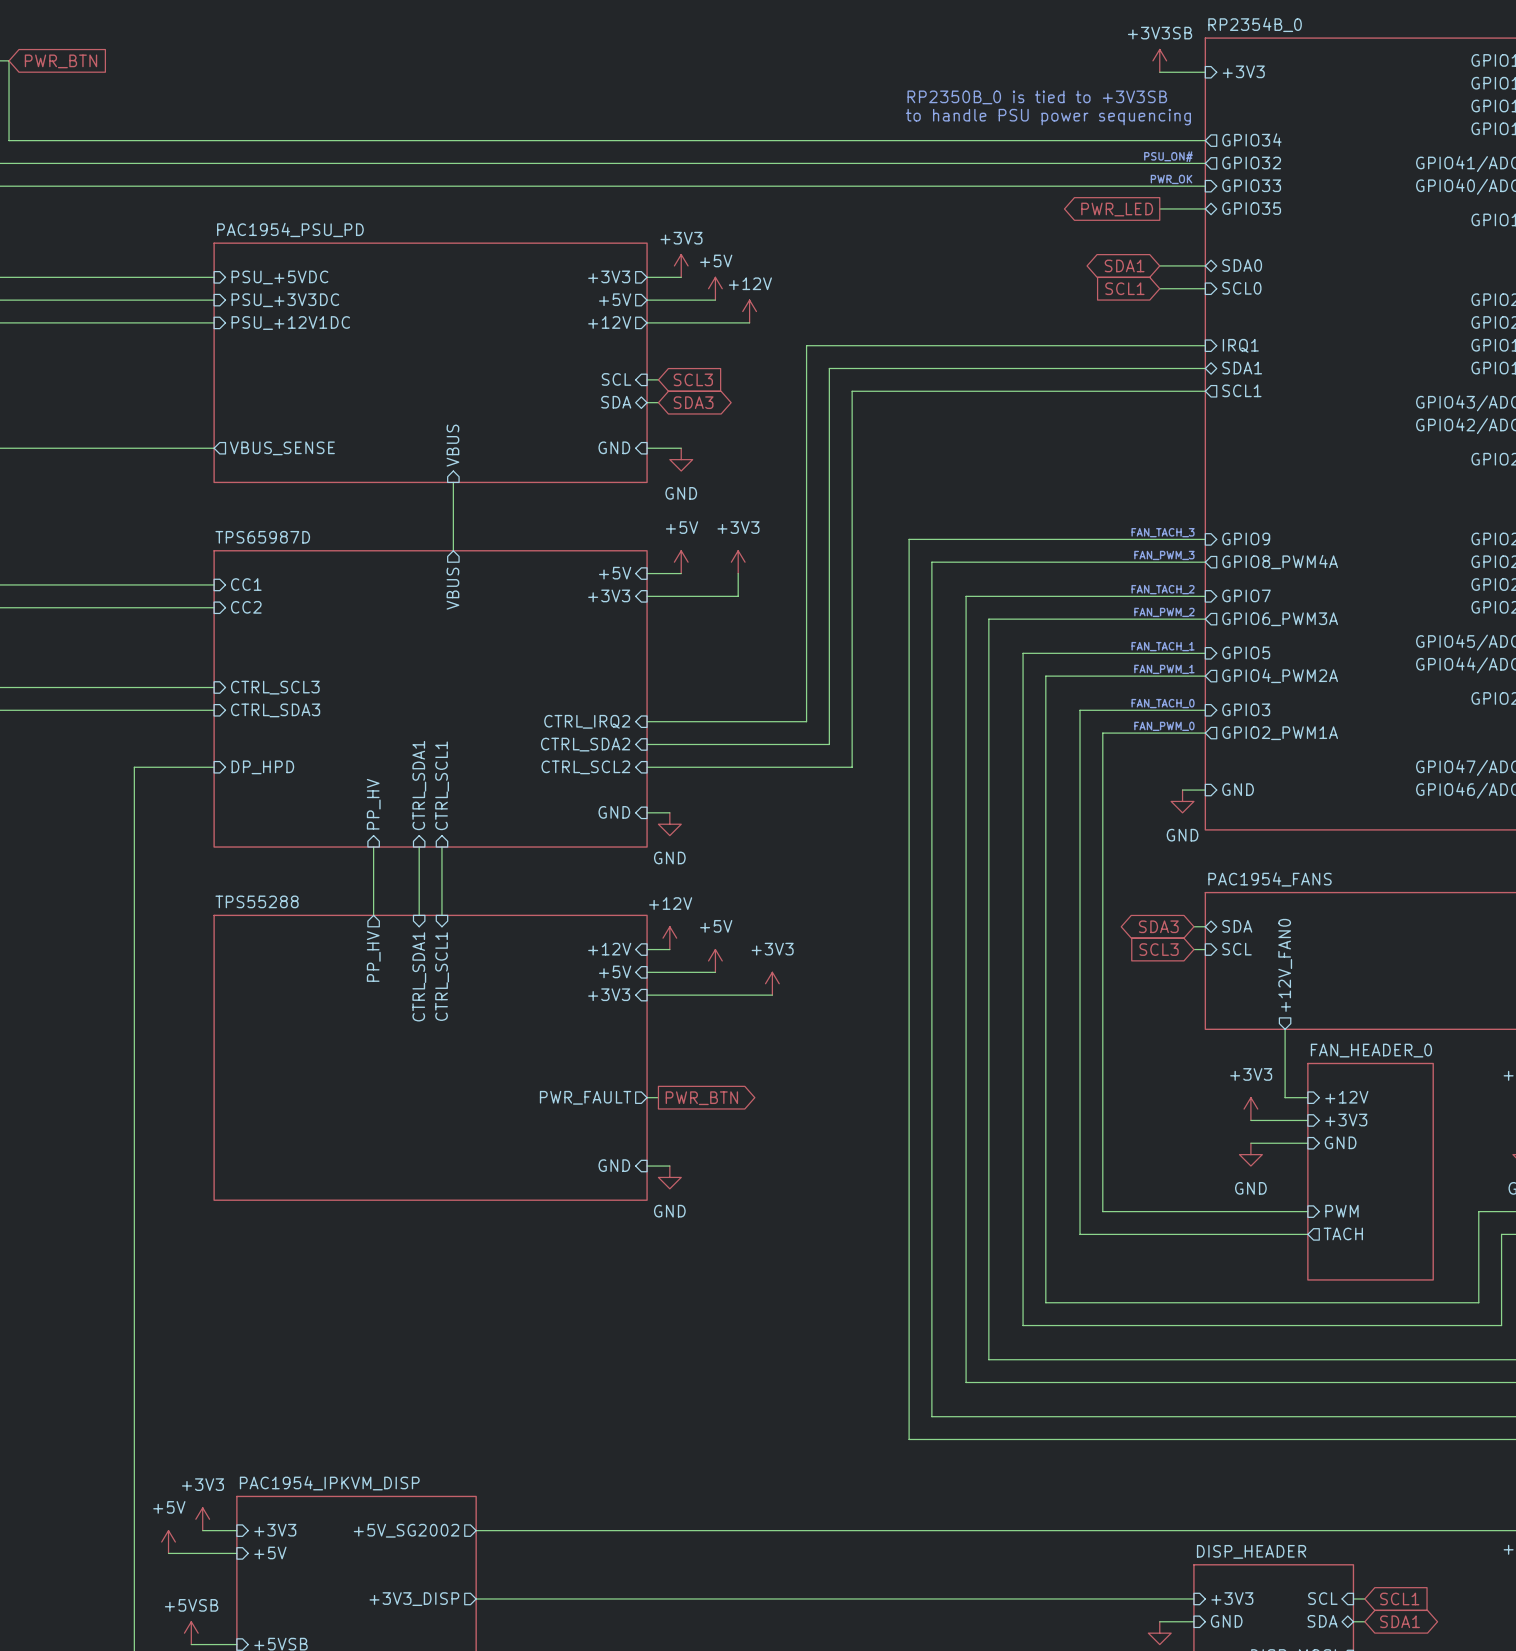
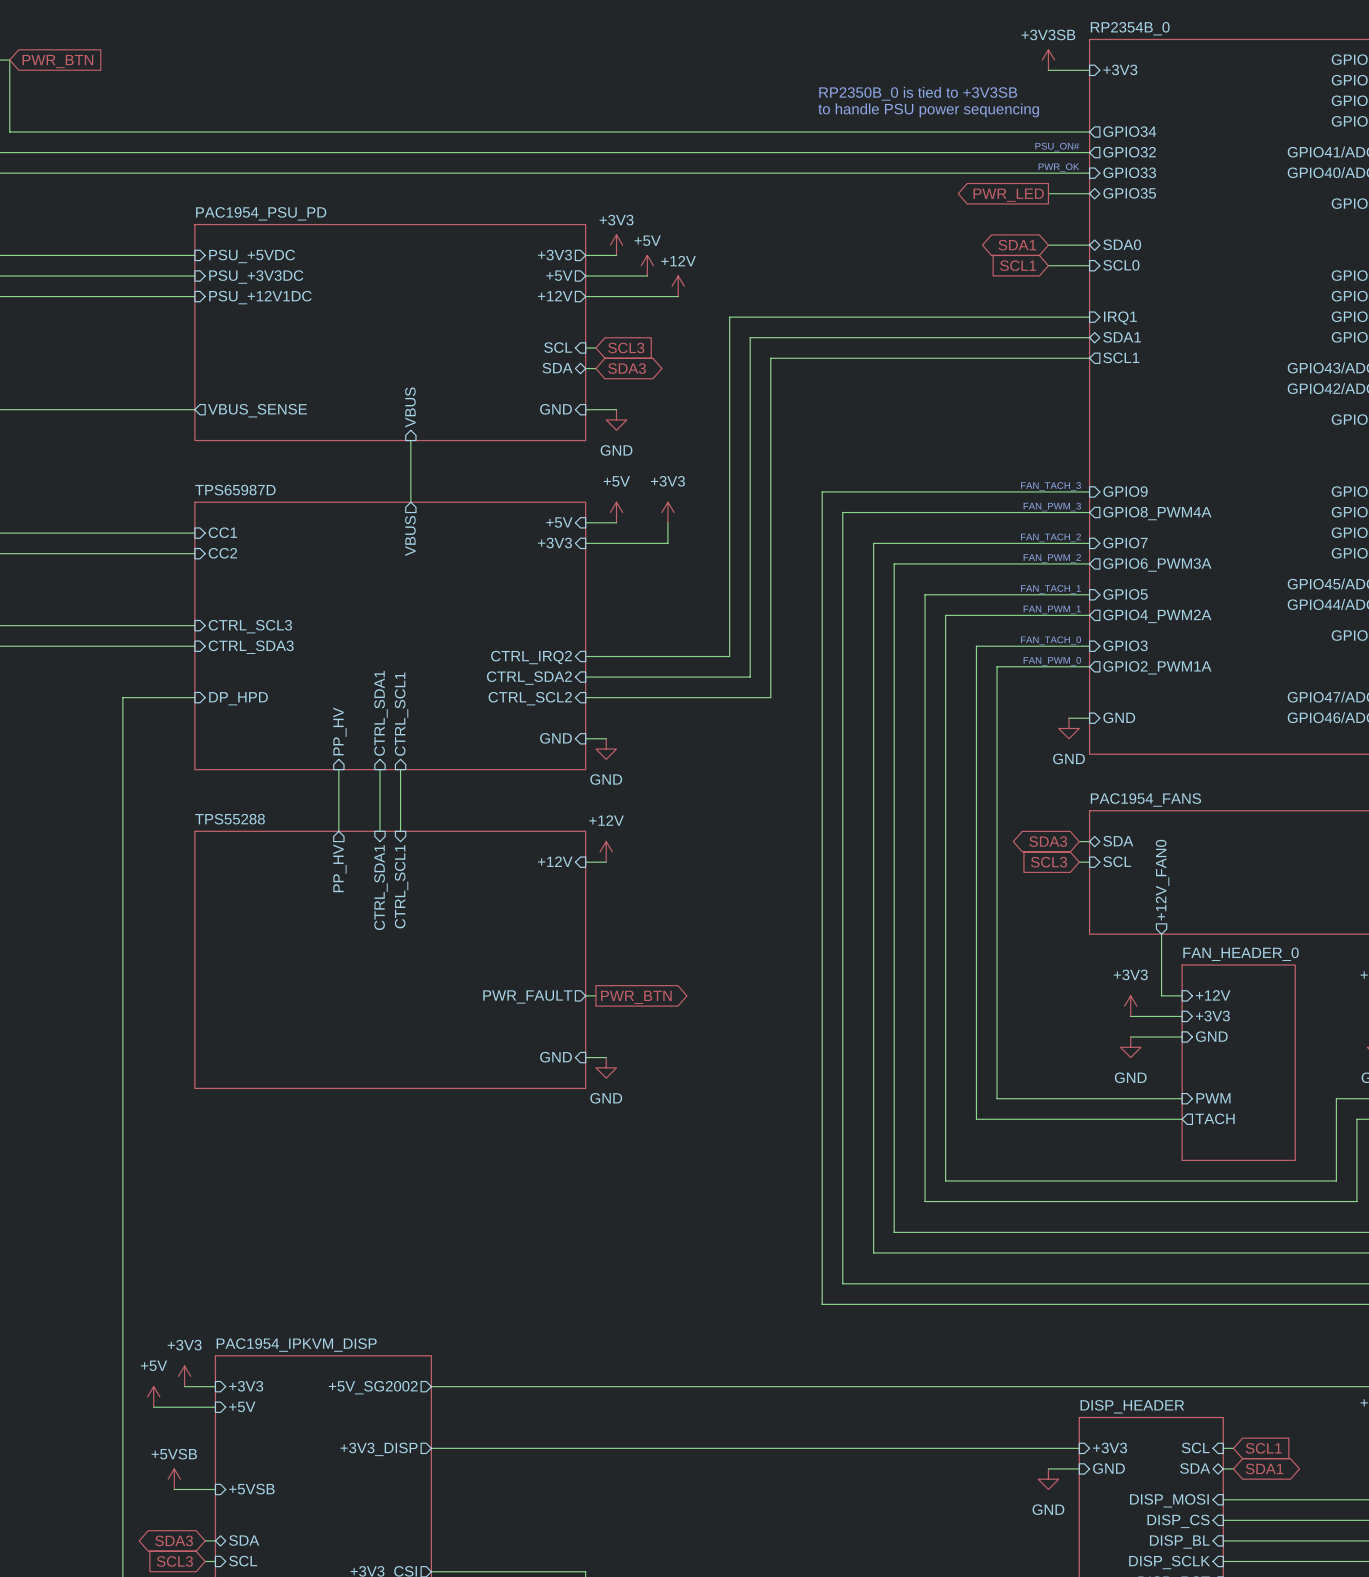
power symbol: +5V (715, 960) -> none
sheet pin: +5V (615, 971) -> none
wire: (647, 972) (715, 972) -> none
power symbol: +3V3 (772, 983) -> none
sheet pin: +3V3 (609, 994) -> none
wire: (647, 995) (772, 995) -> none

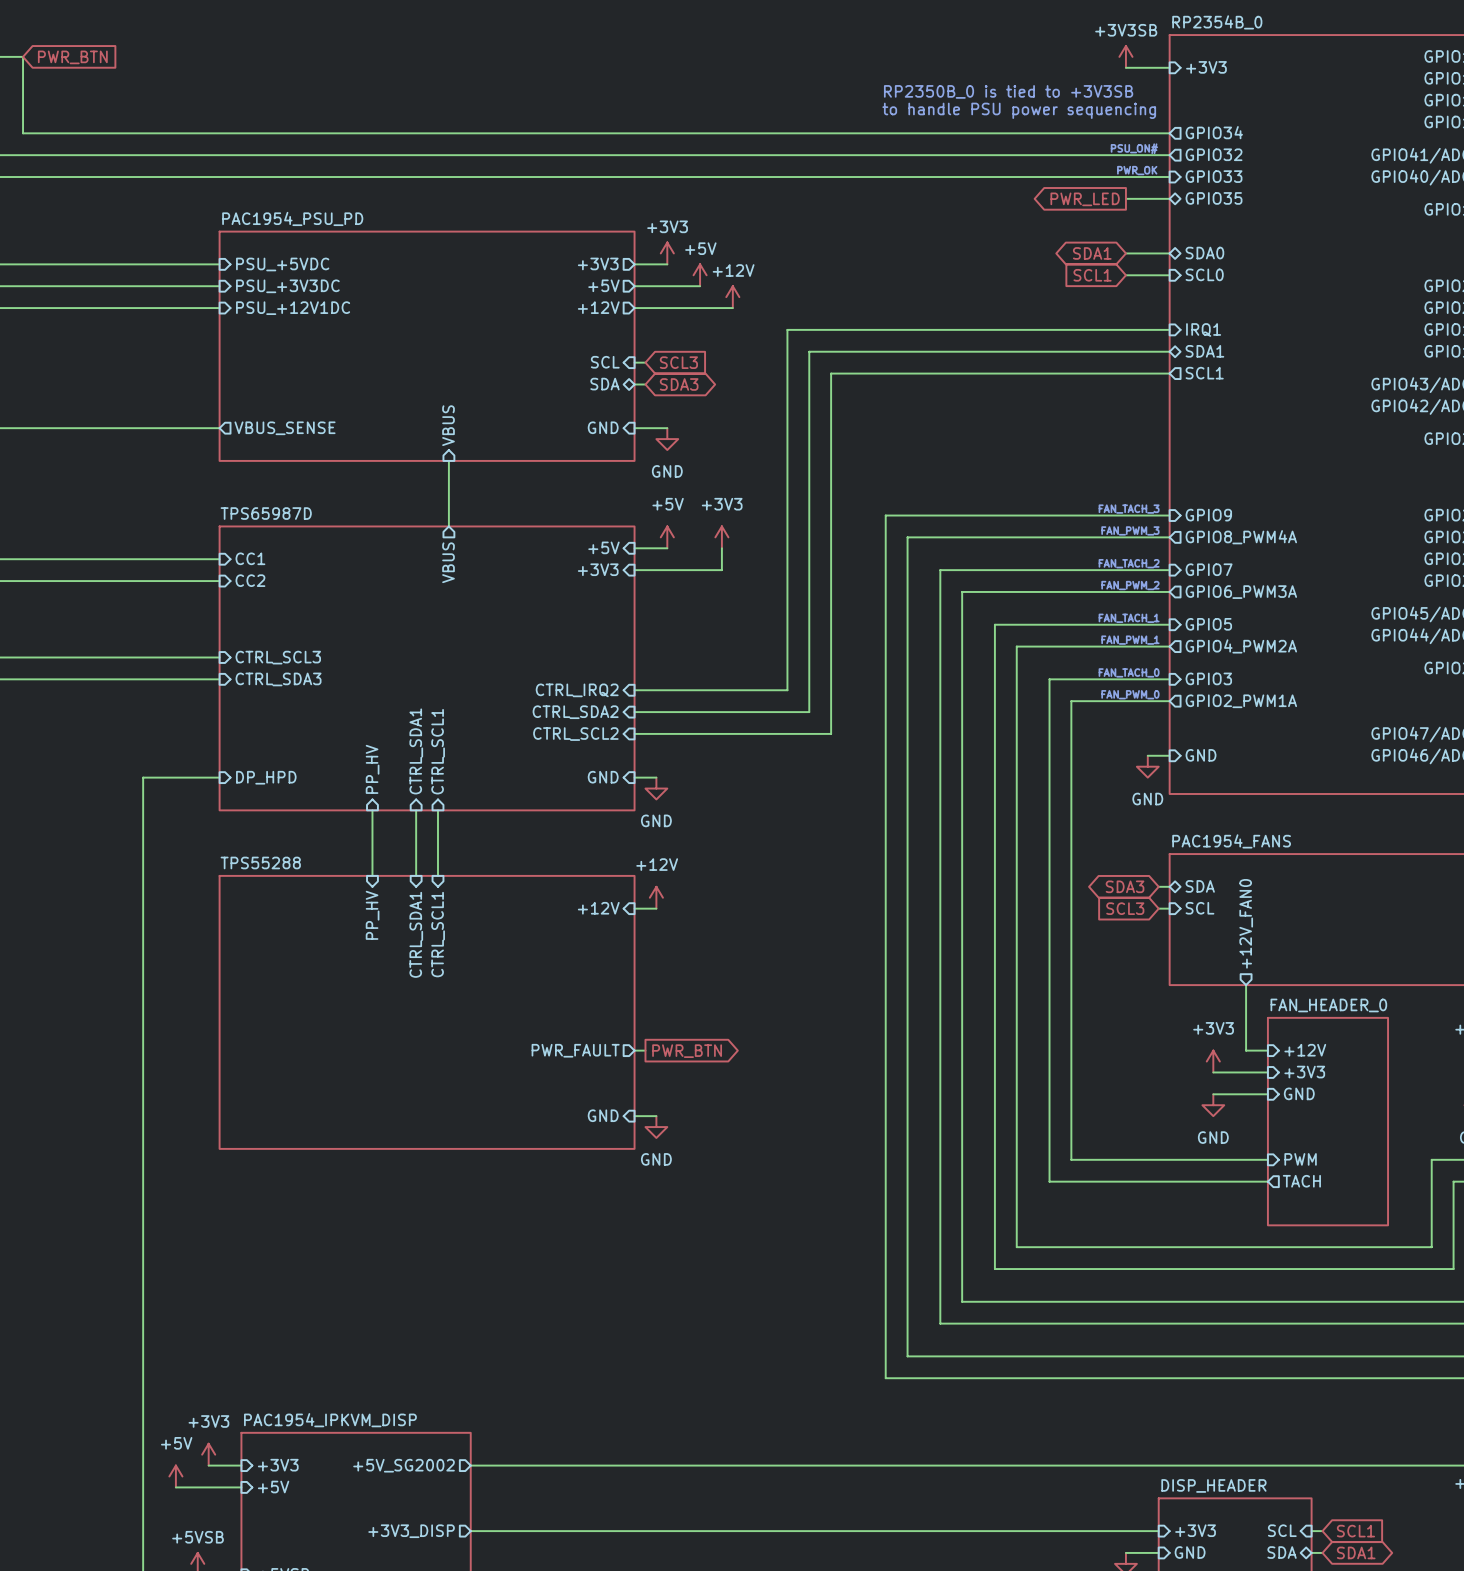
wire: (194, 697) (122, 697) (122, 738) -> (219, 777) (143, 777)
sheet pin position: DP_HPD (238, 698) -> DP_HPD (266, 777)
sheet pin shape: output (339, 868) -> input (372, 915)

